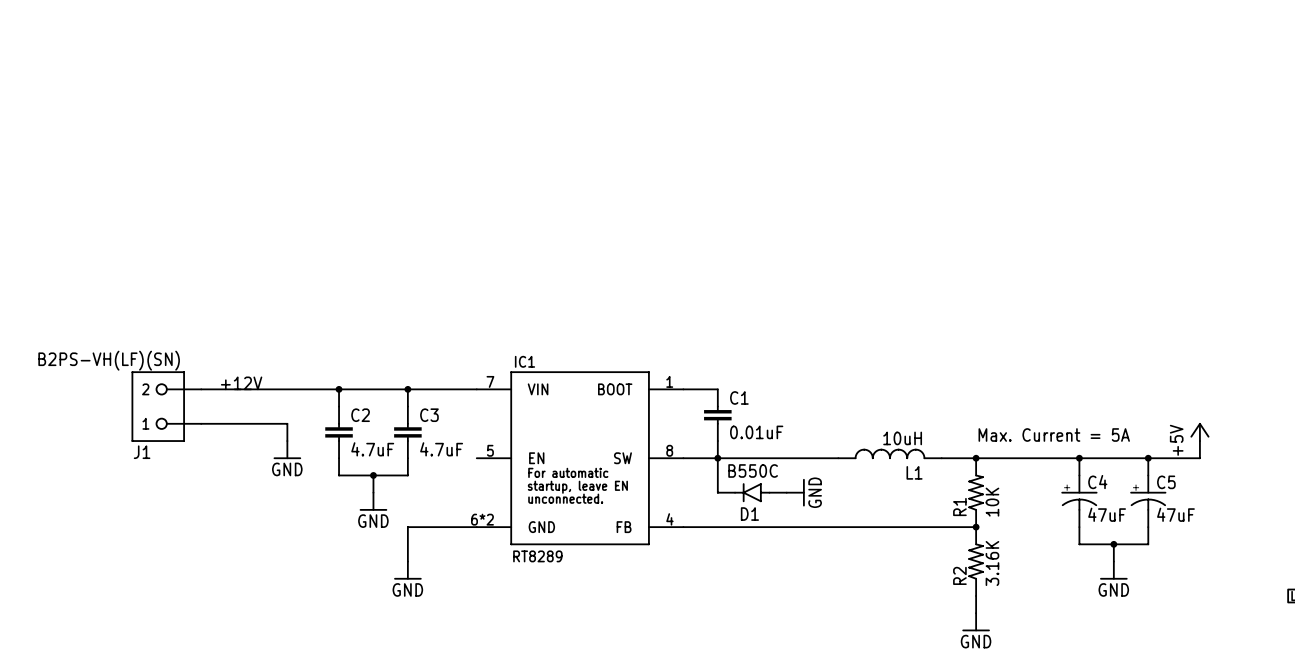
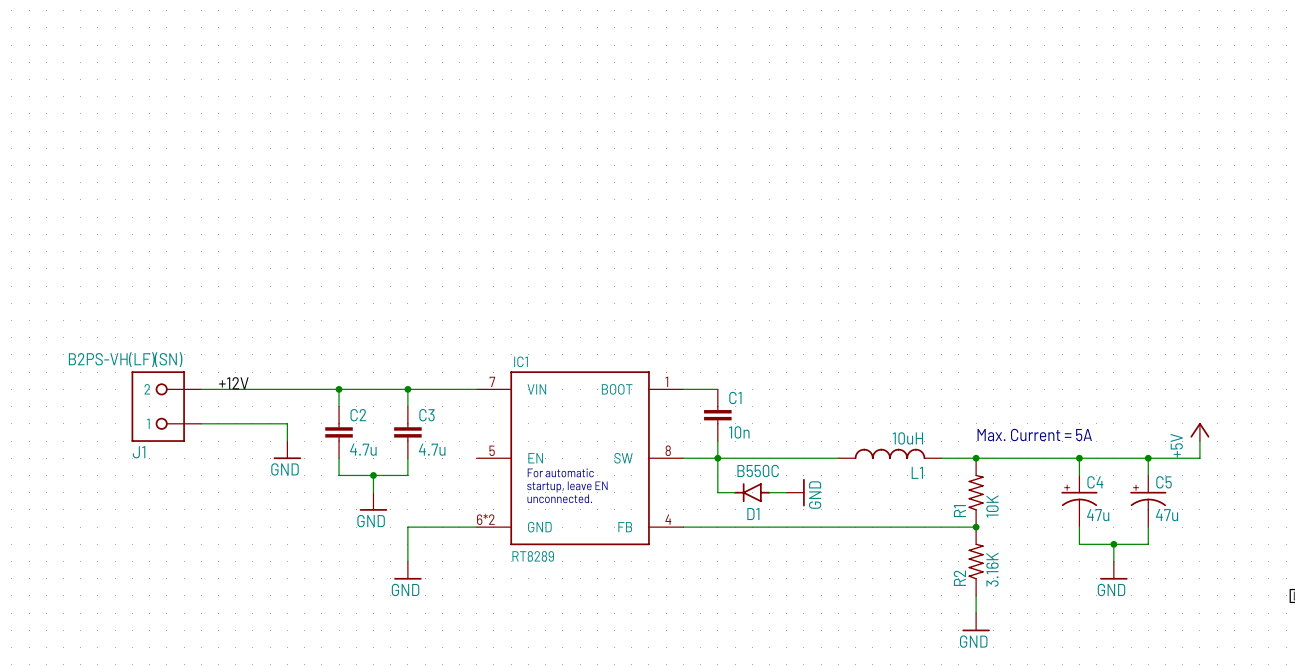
C1 value: 0.01uF (756, 432) -> 10n (739, 432)
C2 value: 4.7uF (372, 449) -> 4.7u (363, 449)
C3 value: 4.7uF (441, 449) -> 4.7u (432, 449)
C4 value: 47uF (1107, 514) -> 47u (1098, 515)
C5 value: 47uF (1175, 514) -> 47u (1167, 515)

